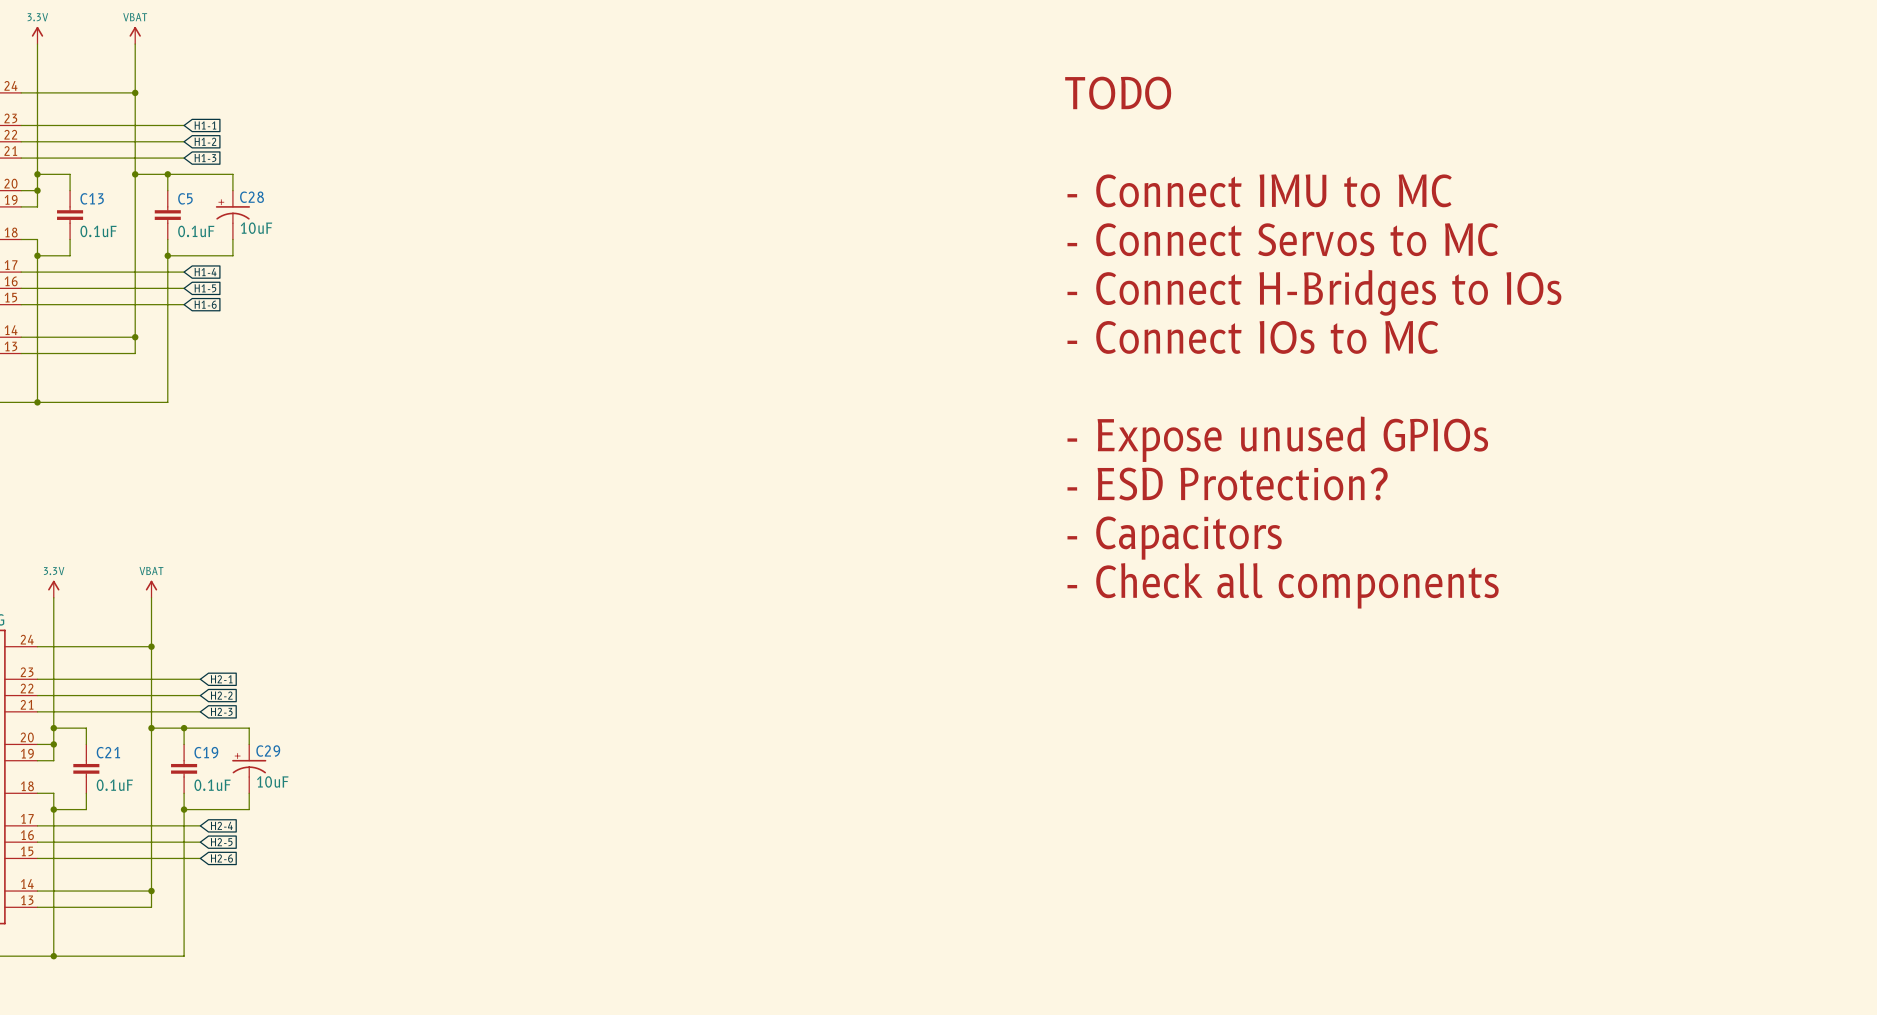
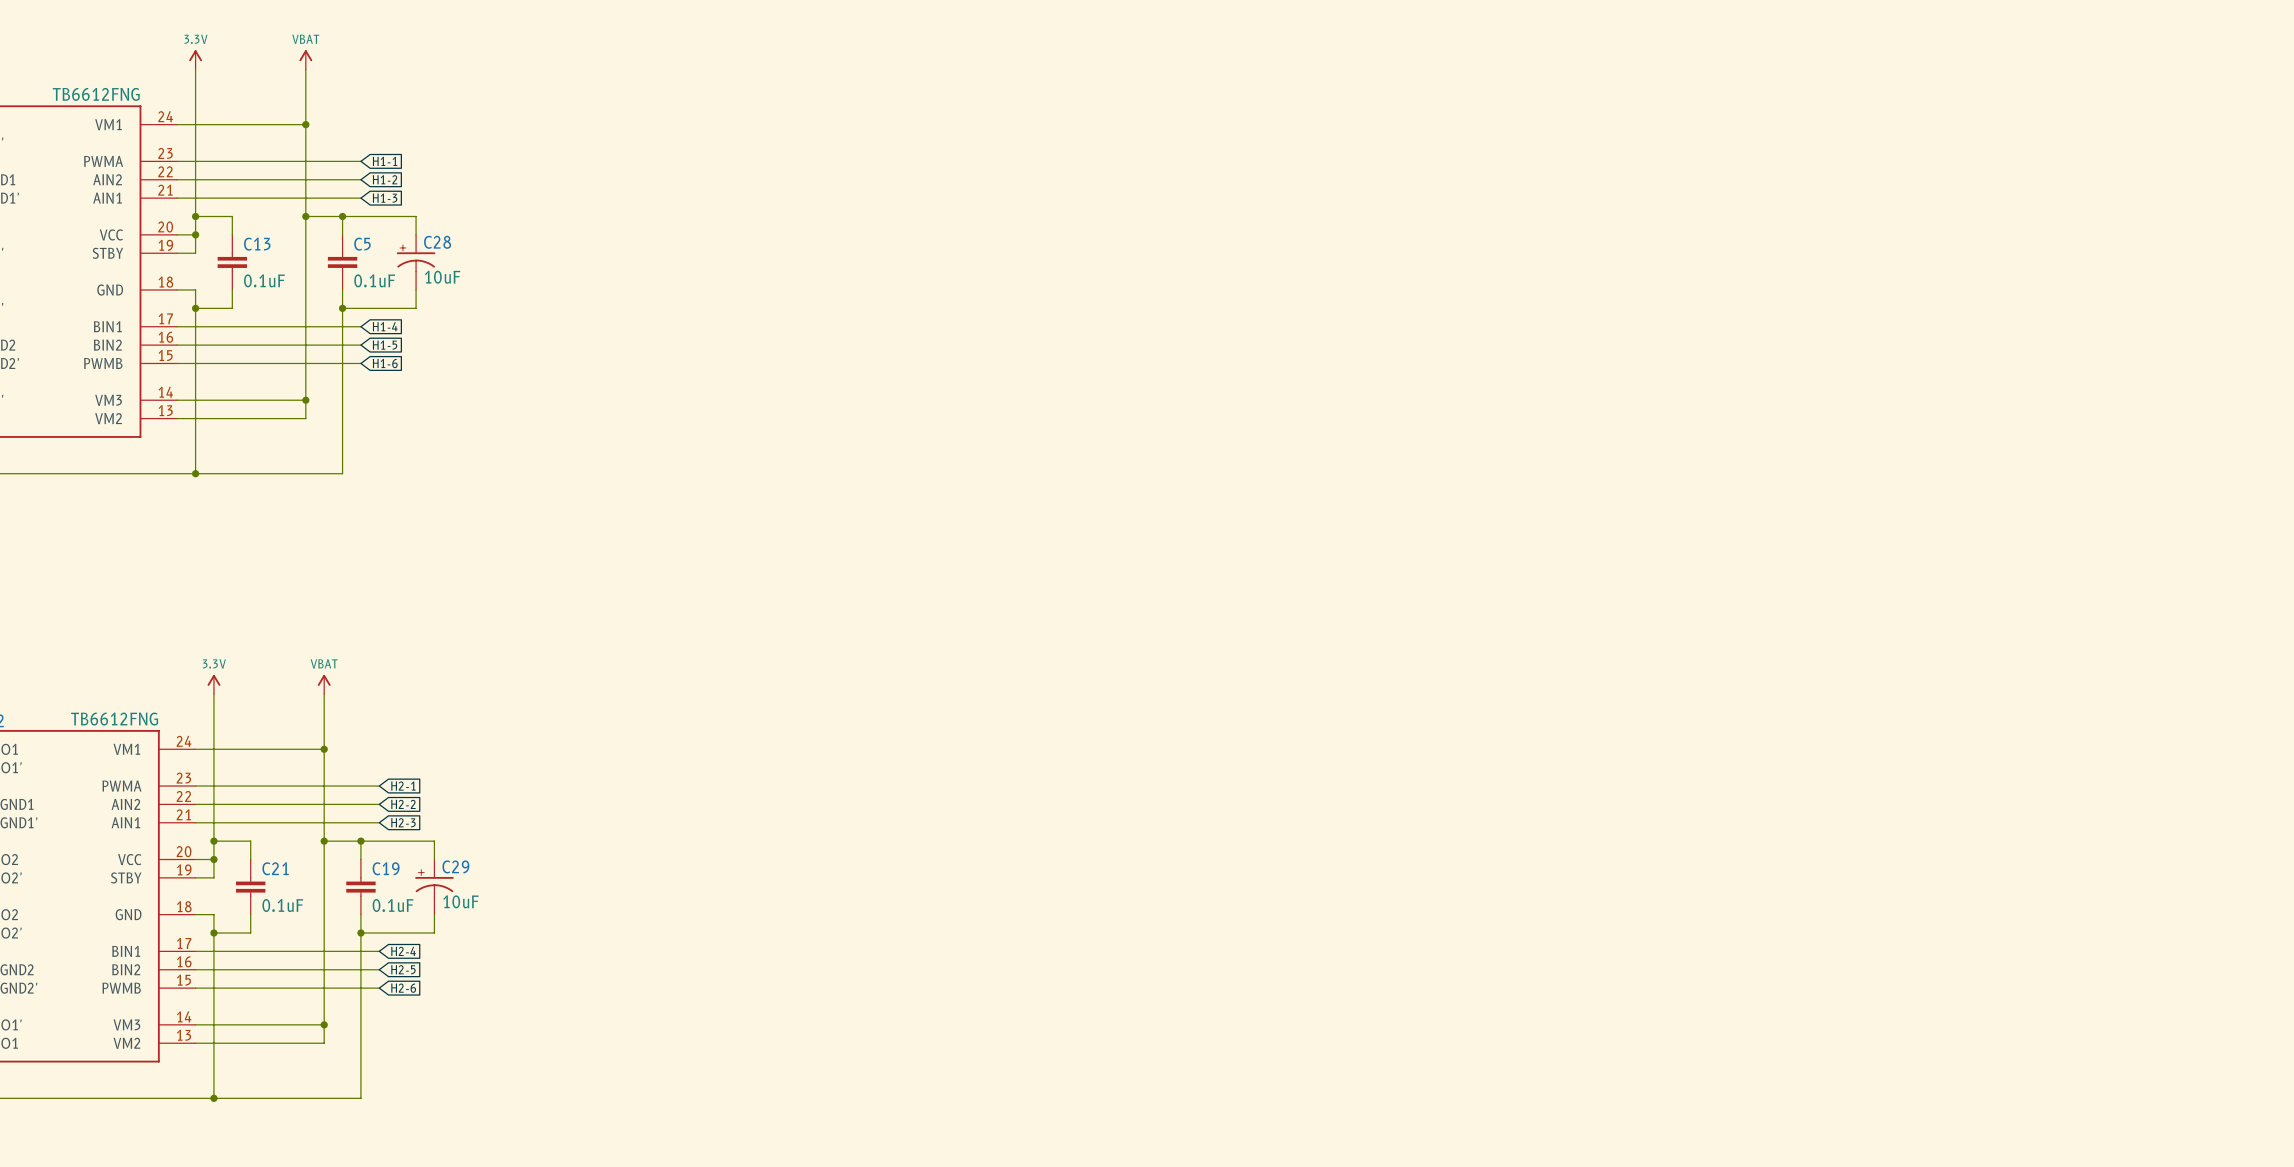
text: TODO (1118, 93) -> none
text: - Connect IMU to MC (1259, 190) -> none
text: - Connect Servos to MC (1282, 239) -> none
text: - Connect H-Bridges to IOs (1314, 292) -> none
text: - Connect IOs to MC (1252, 337) -> none
text: - Expose unused GPIOs (1277, 439) -> none
text: - ESD Protection? (1227, 484) -> none
text: - Capacitors (1174, 538) -> none
text: - Check all components (1283, 585) -> none

